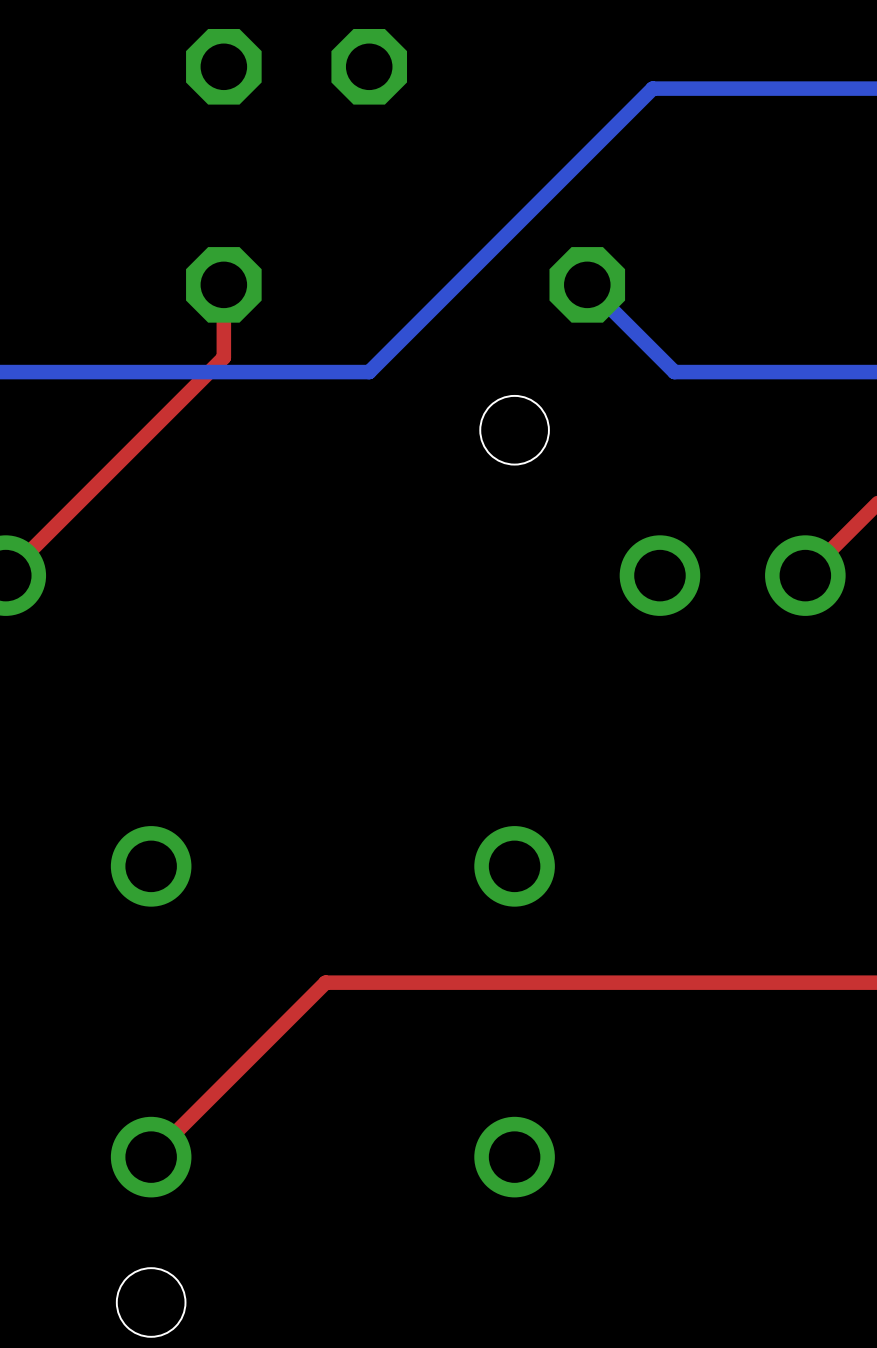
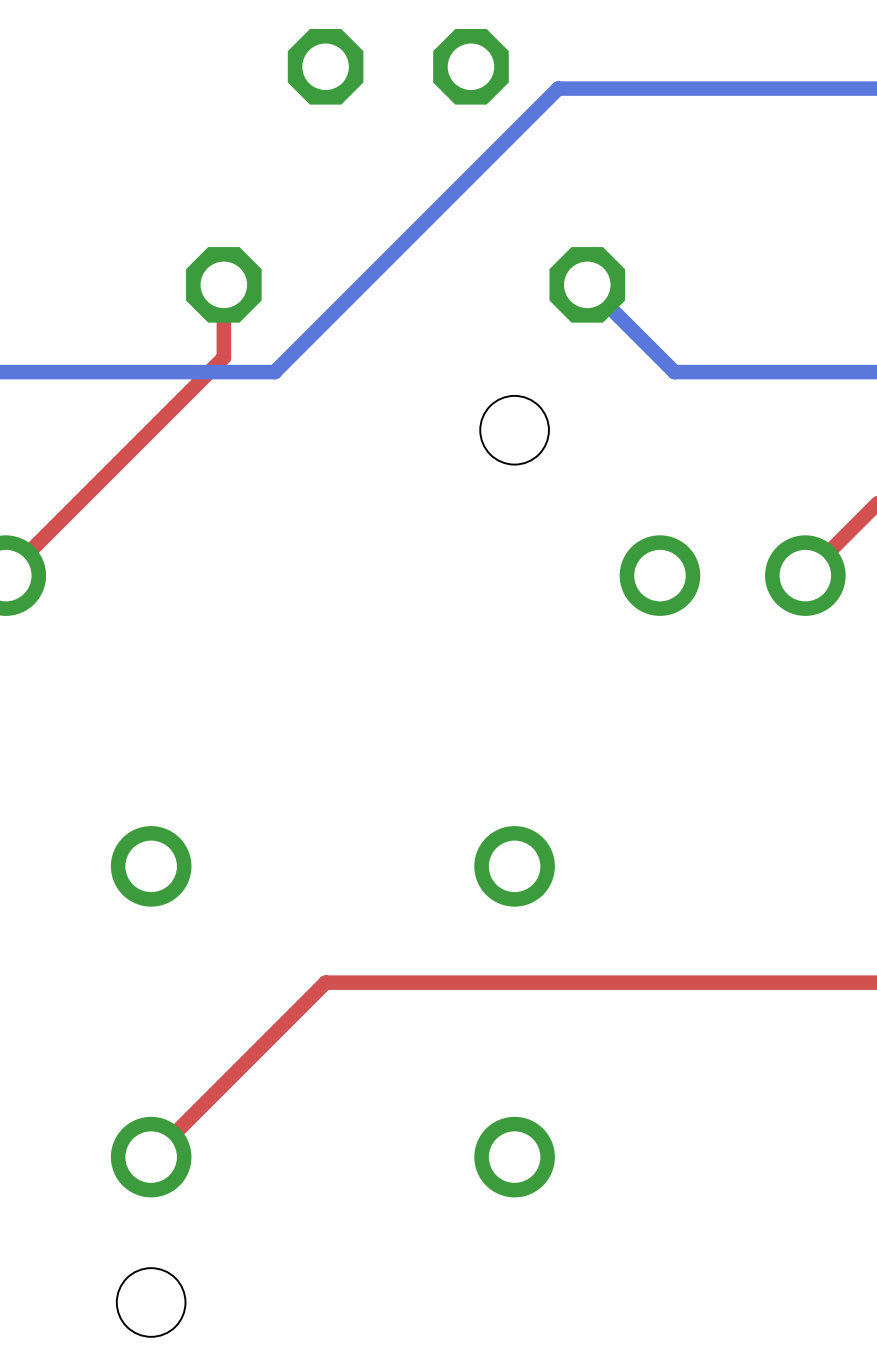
part position: (296, 66) -> (398, 66)
bottom track: (652, 88) (369, 372) (274, 372) -> (652, 88) (558, 88) (274, 372)

